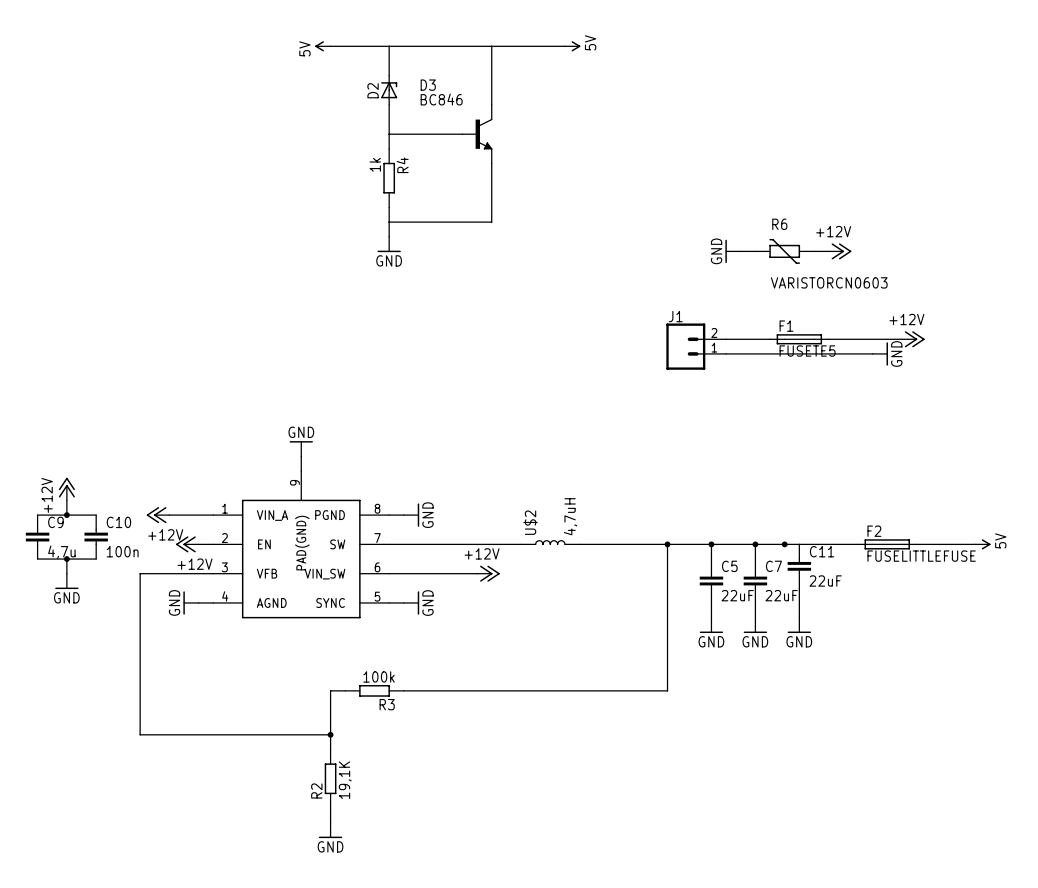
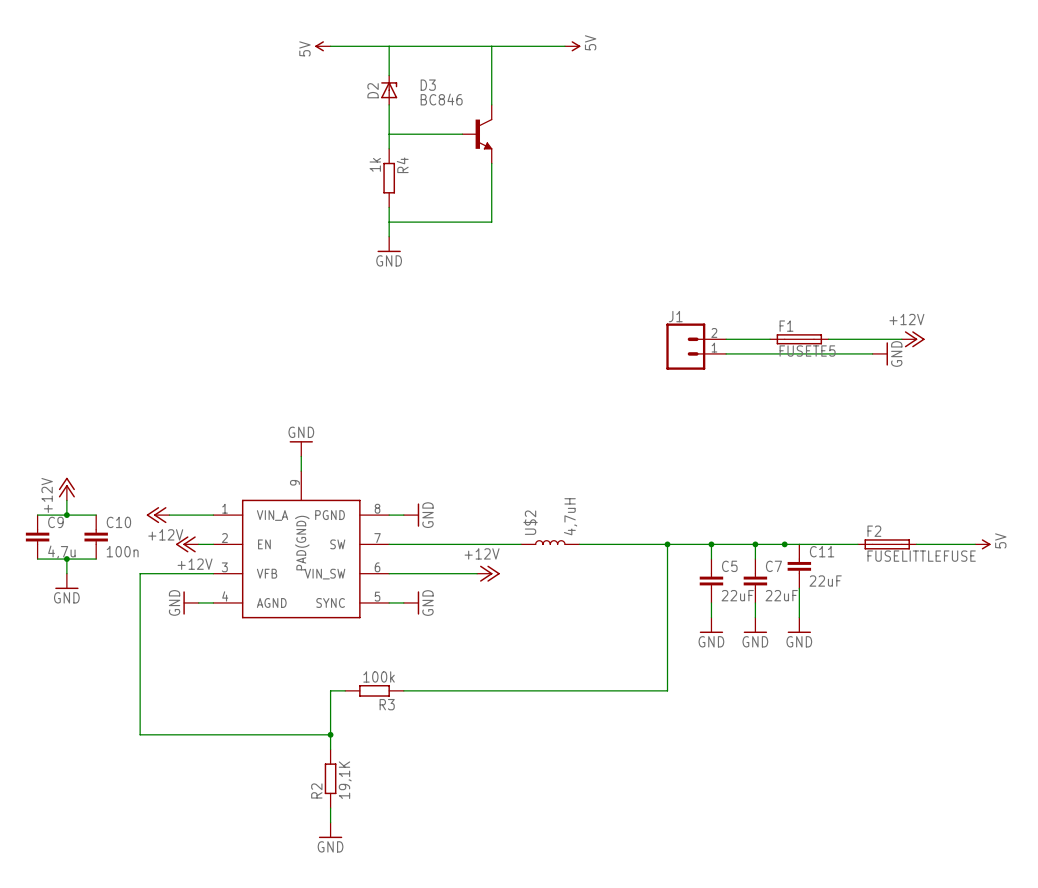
power symbol: GND (733, 251) -> none
wire: (740, 251) (755, 251) -> none
R6: VARISTORCN0603 (784, 251) -> none
wire: (814, 251) (828, 251) -> none
power symbol: +12V (840, 251) -> none

